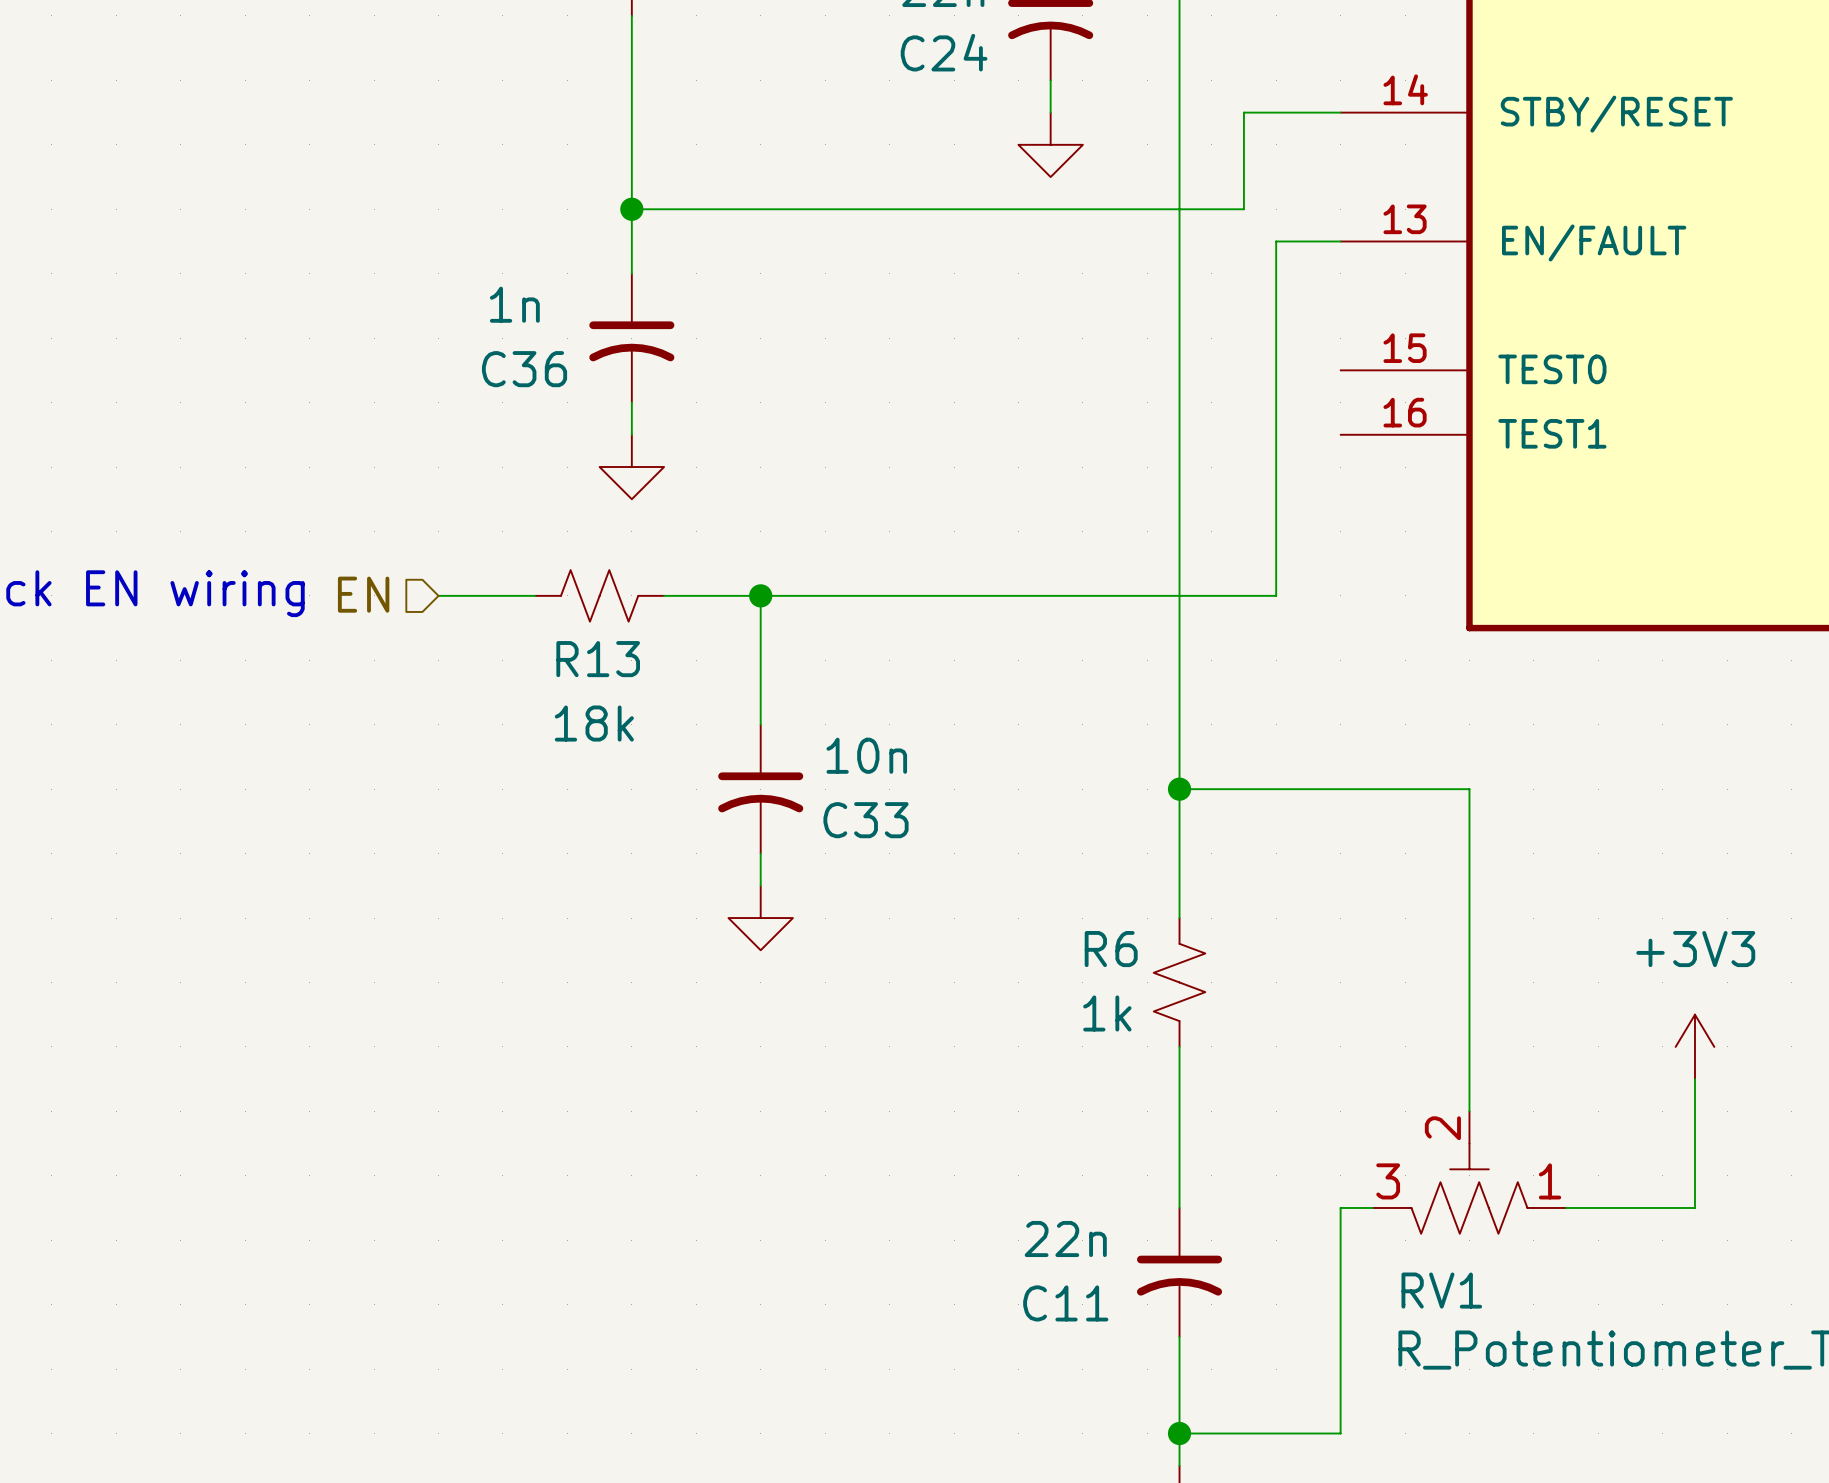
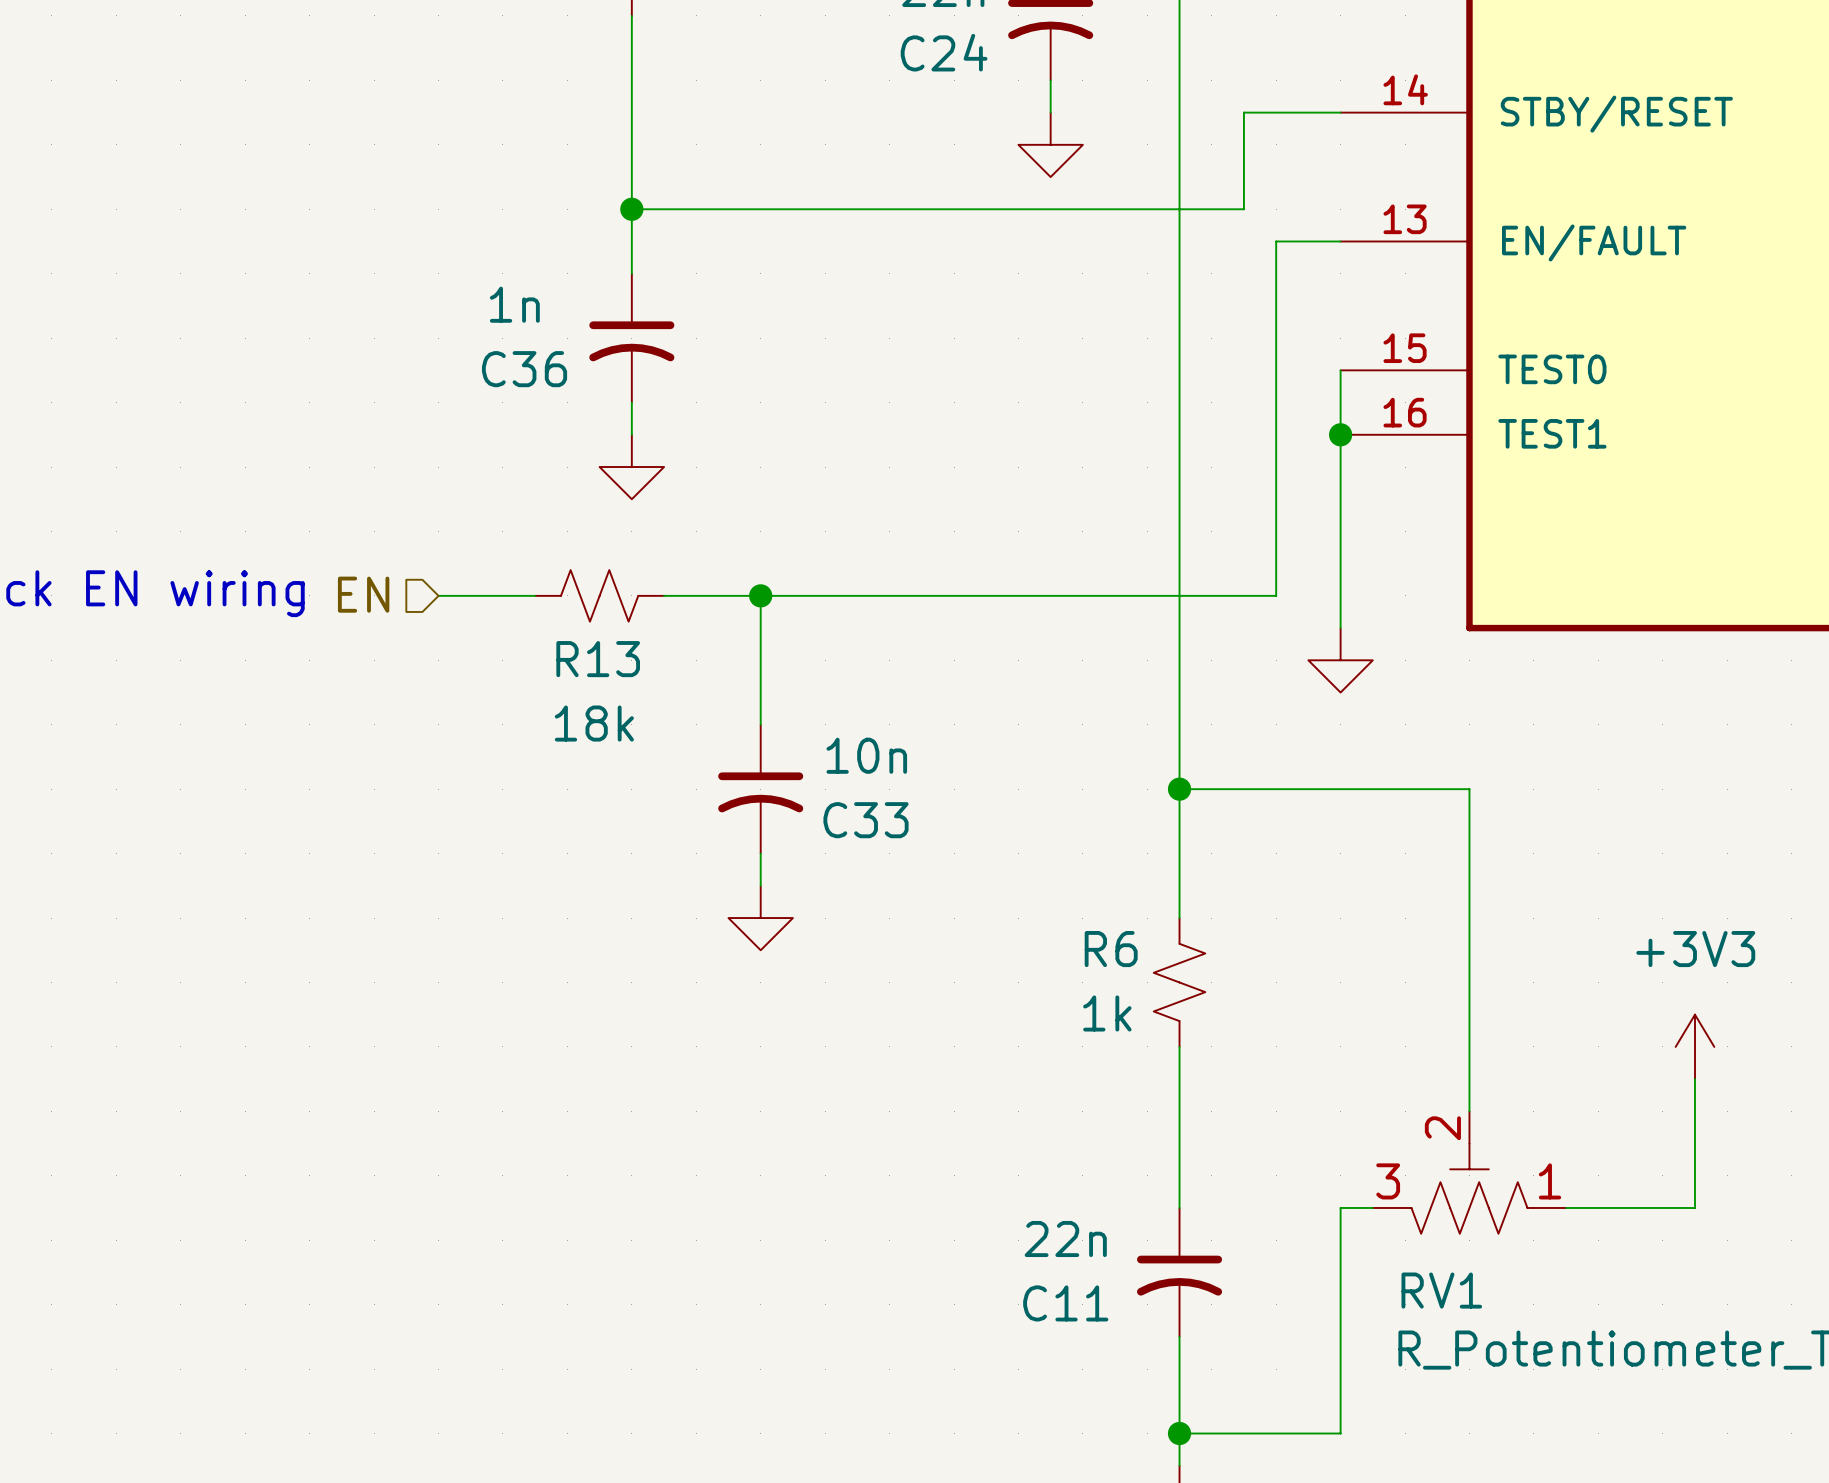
wire: none -> (1340, 370) (1340, 628)
junction: none -> (1340, 434)
power symbol: none -> (1340, 660)

